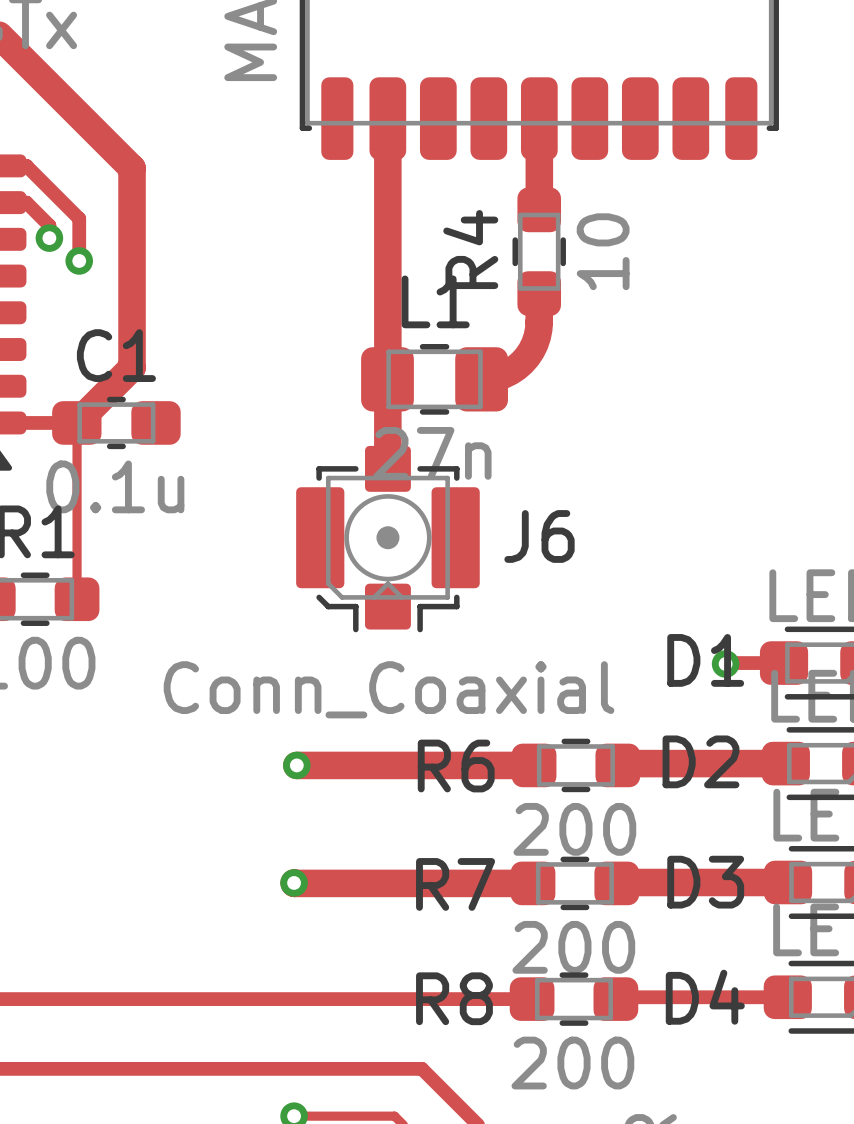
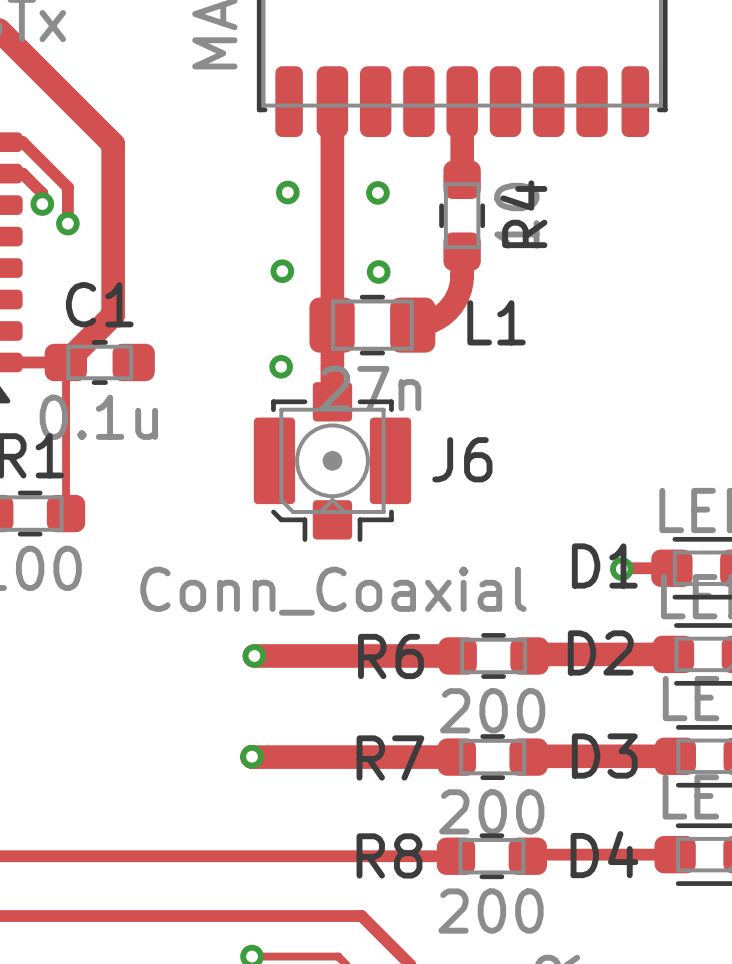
via: none -> (287, 192)
via: none -> (377, 192)
R4 name position: R4 (470, 249) -> R4 (523, 214)
L1 name position: L1 (435, 301) -> L1 (496, 322)
via: none -> (282, 271)
via: none -> (378, 271)
via: none -> (281, 366)

